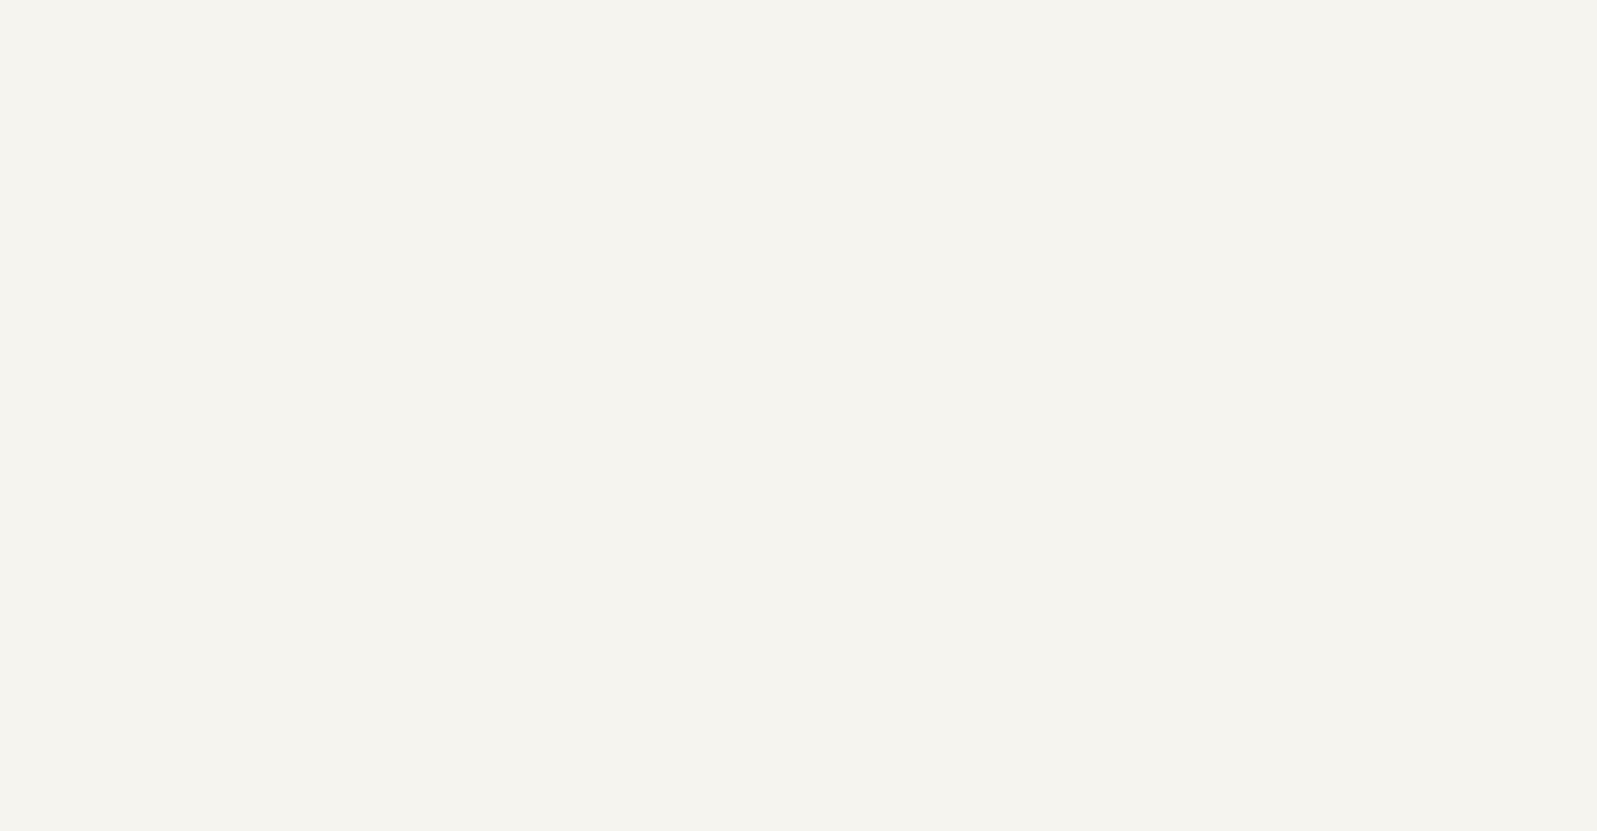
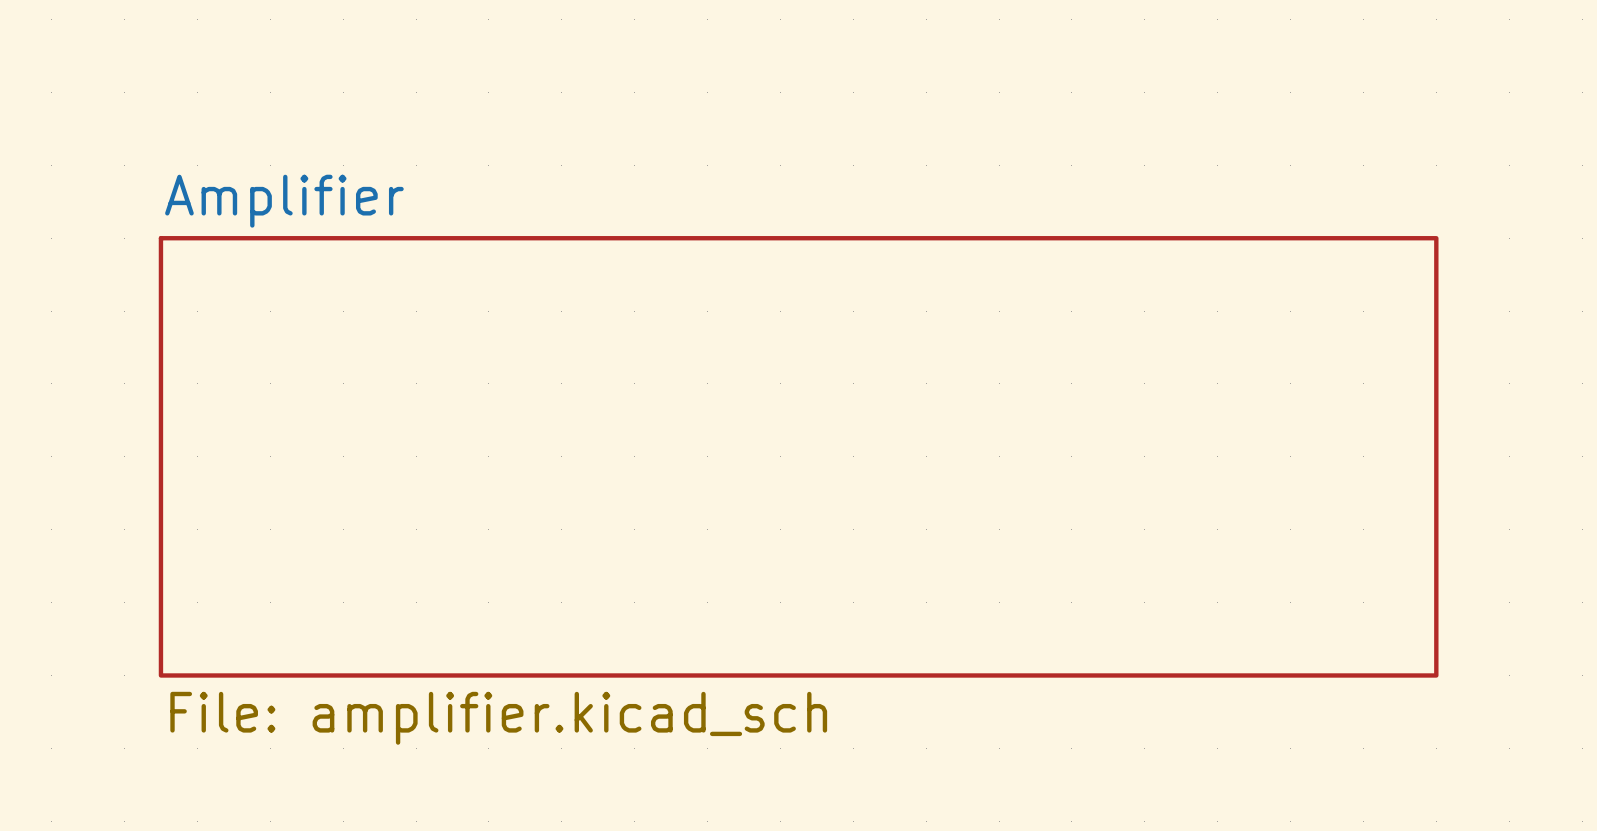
sheet Amplifier: none -> File: amplifier.kicad_sch (798, 456)

